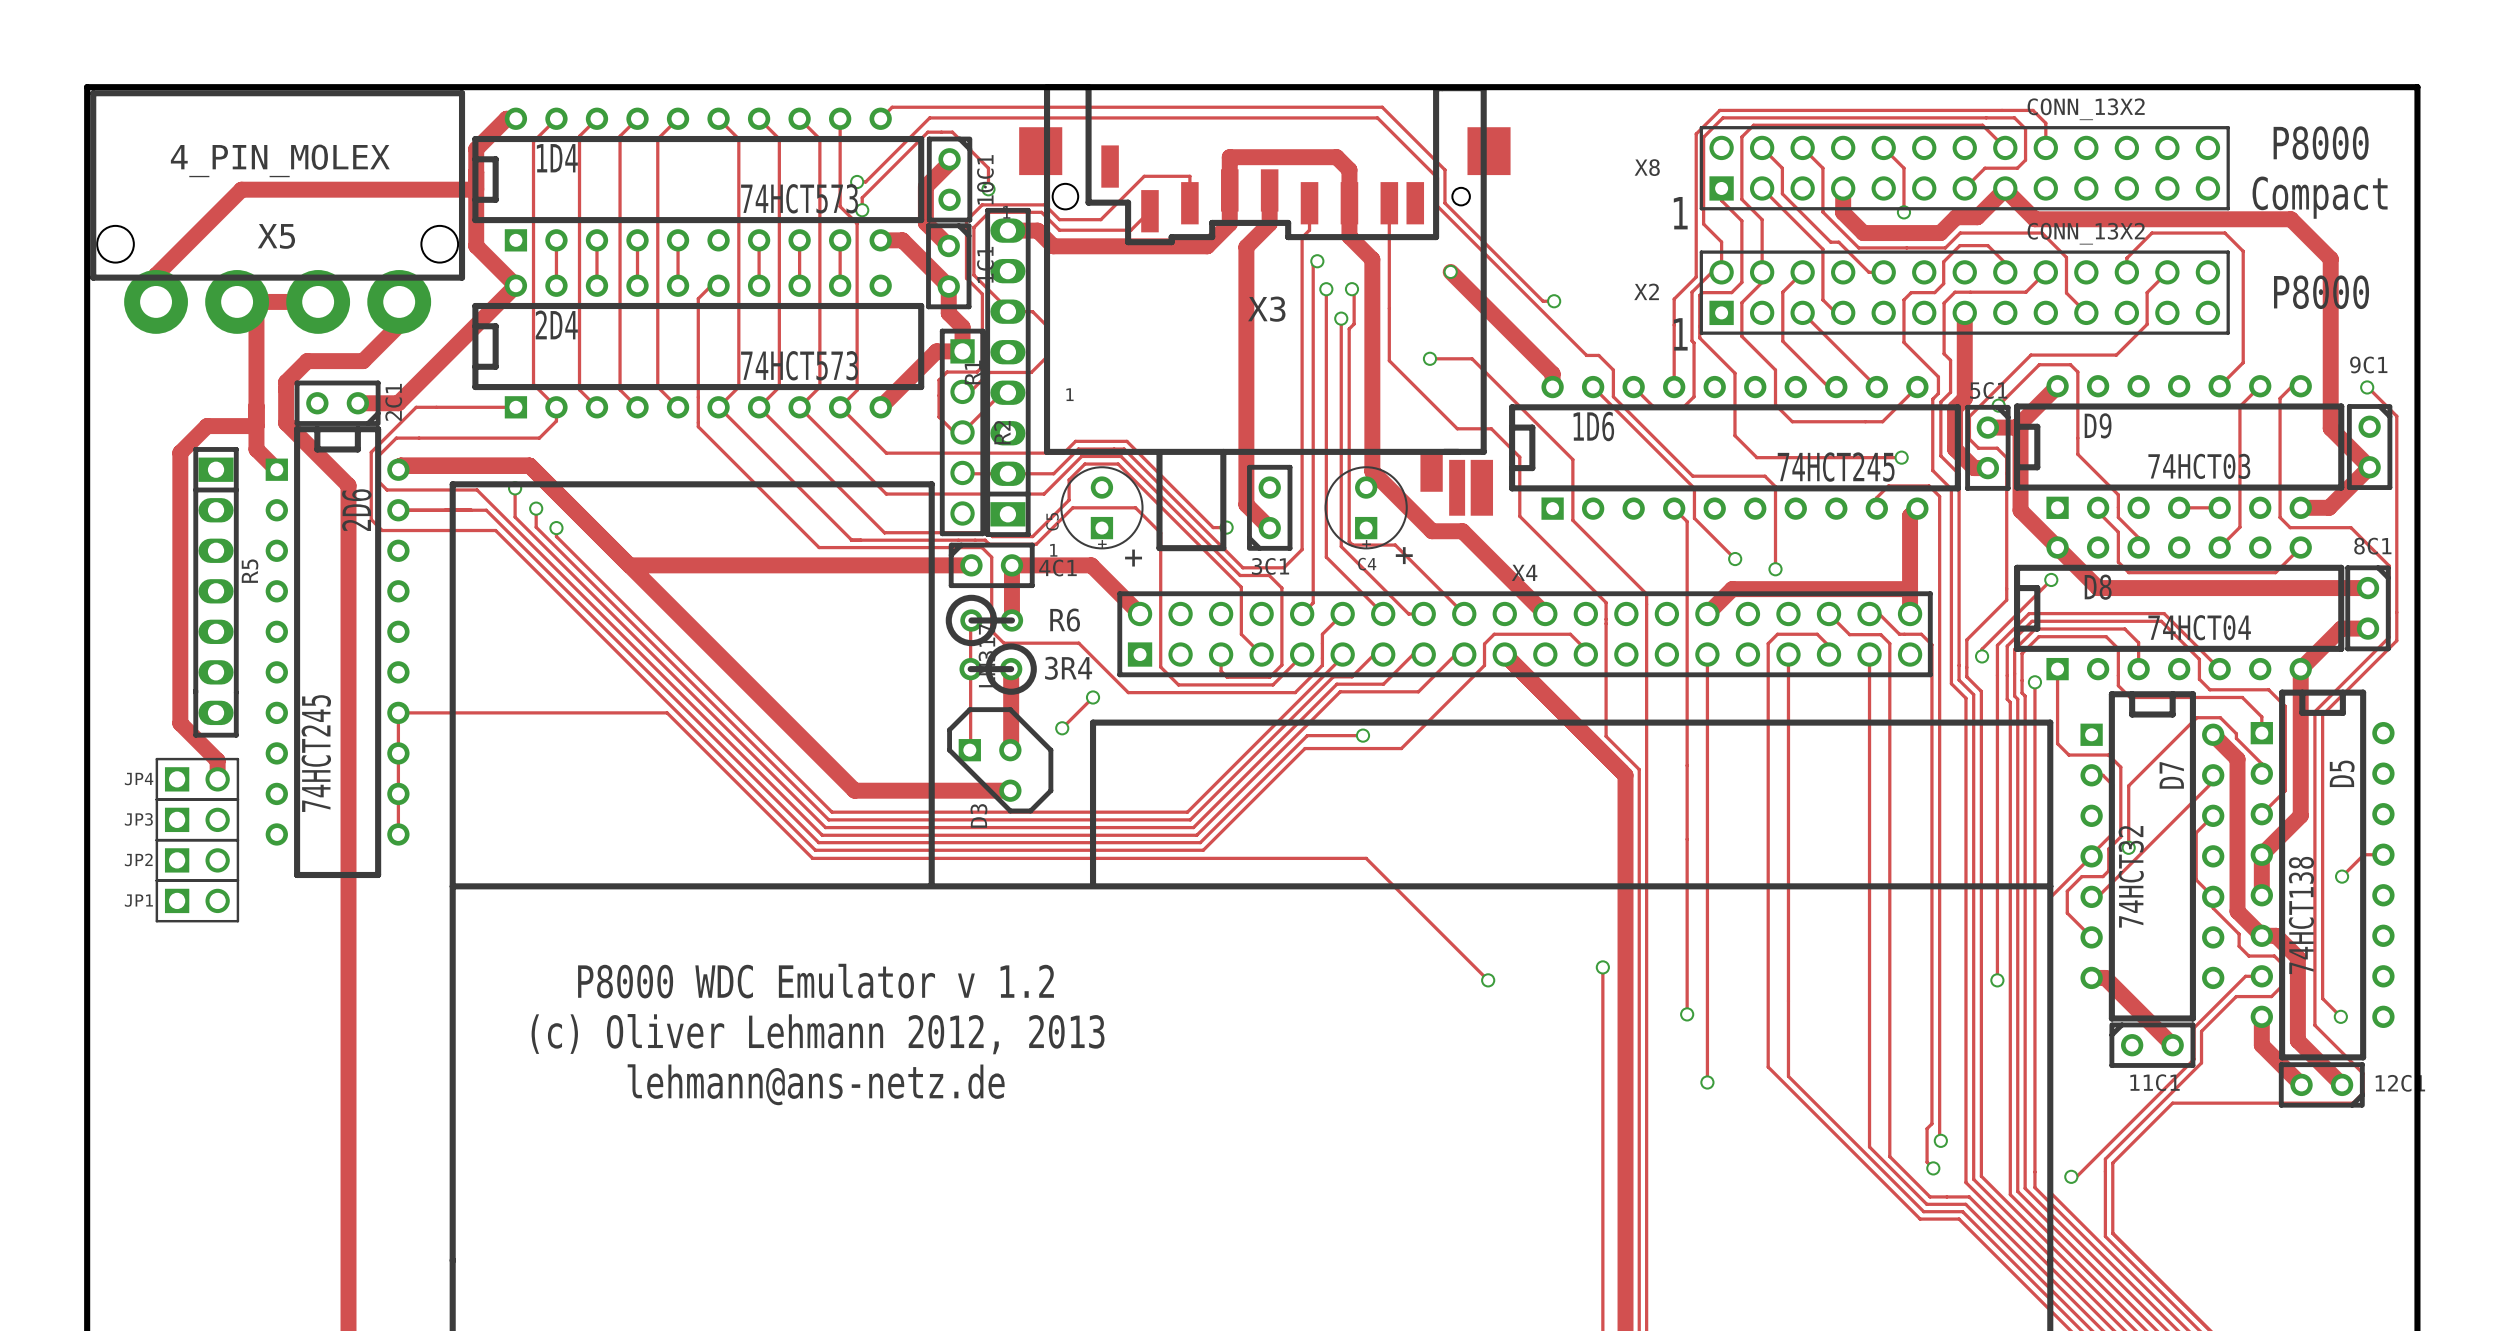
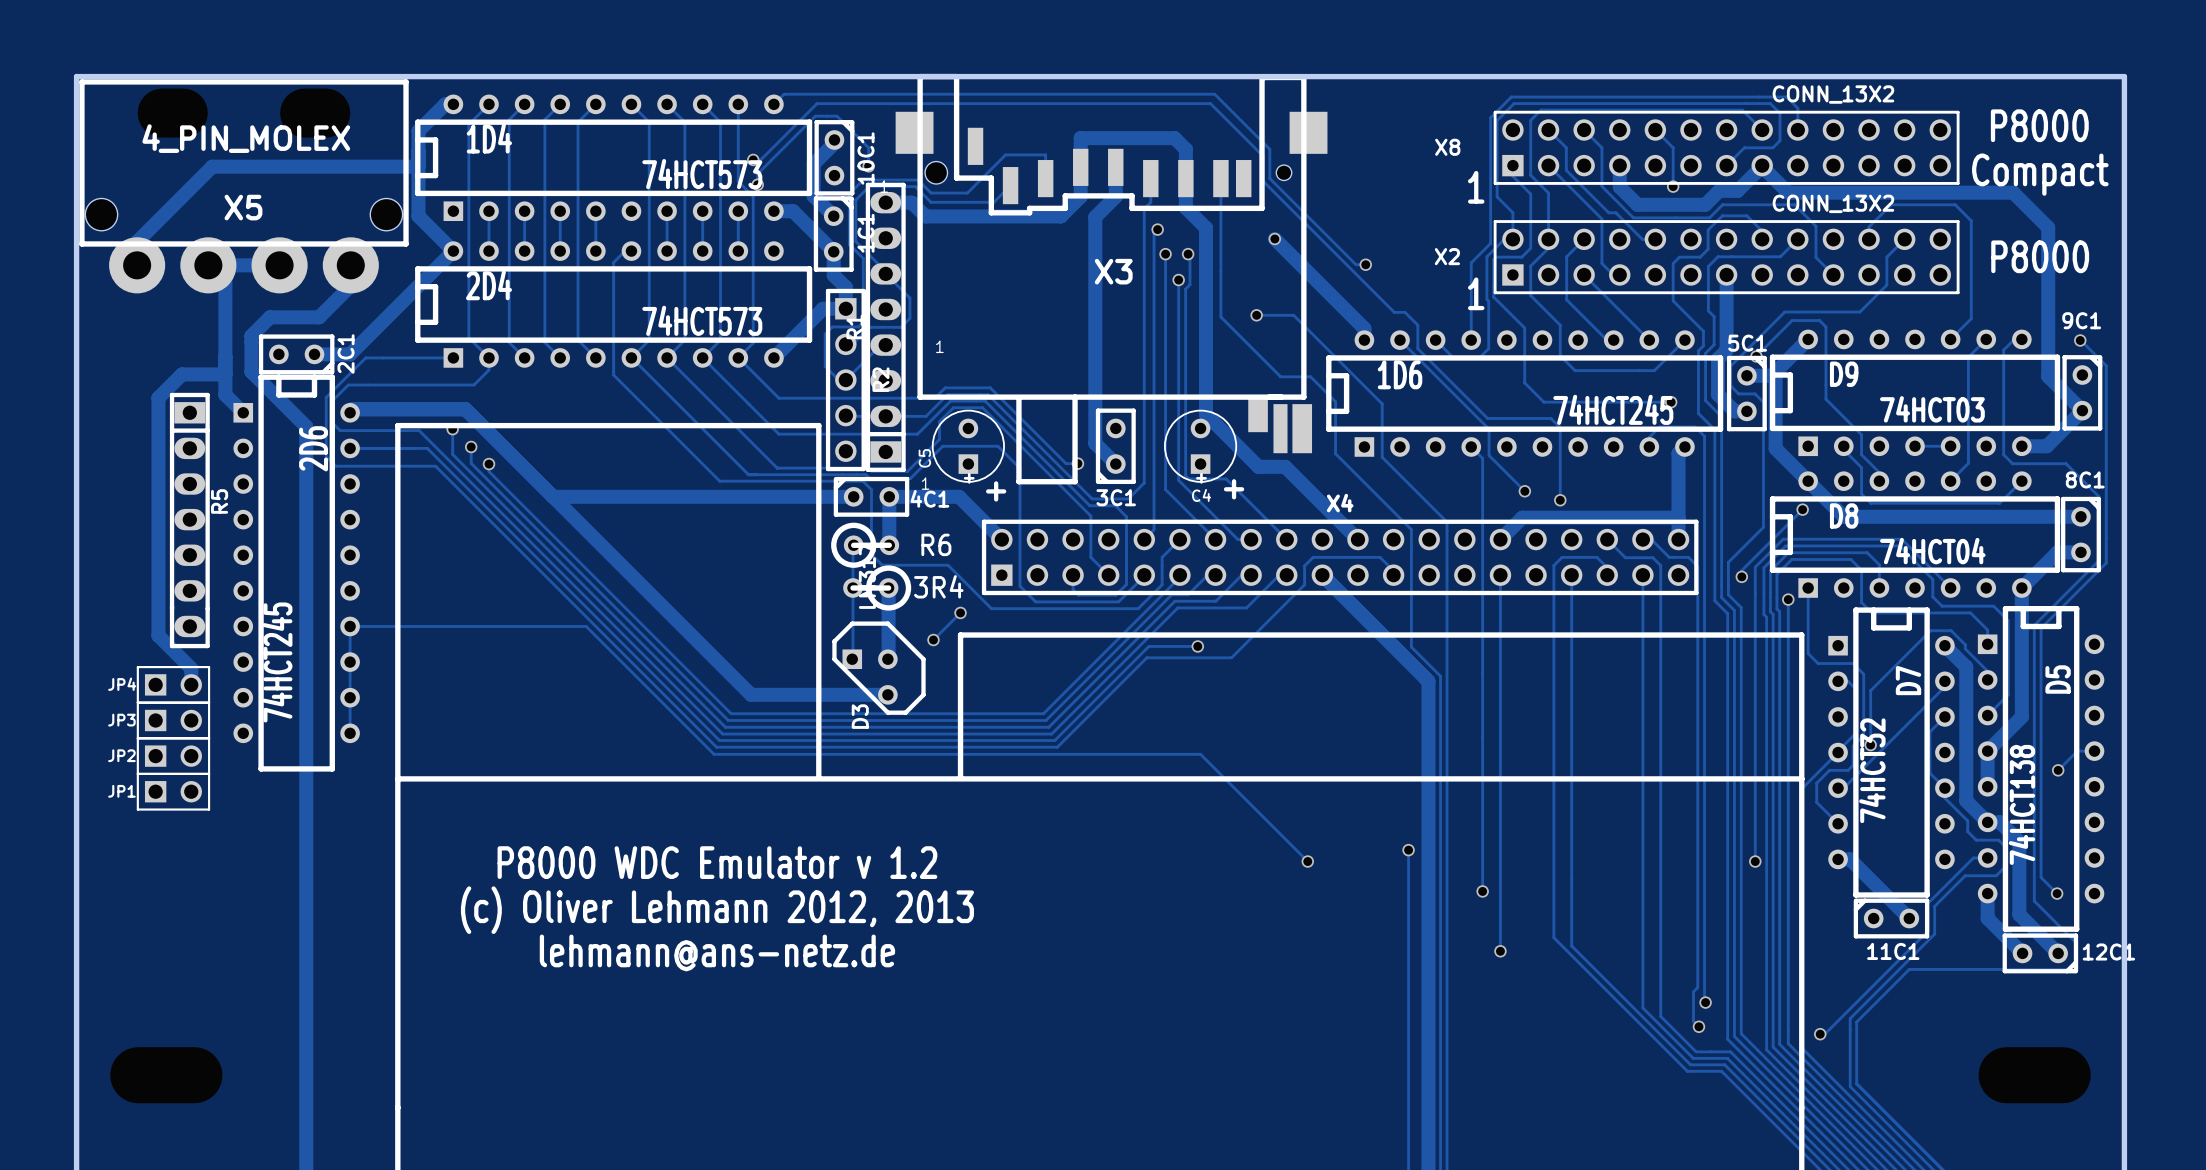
track: (973, 275) (1010, 311) (1032, 311) (1047, 326) (1047, 356) (1031, 372) (1025, 372) -> (855, 241) (909, 298) (909, 318) (900, 327)

